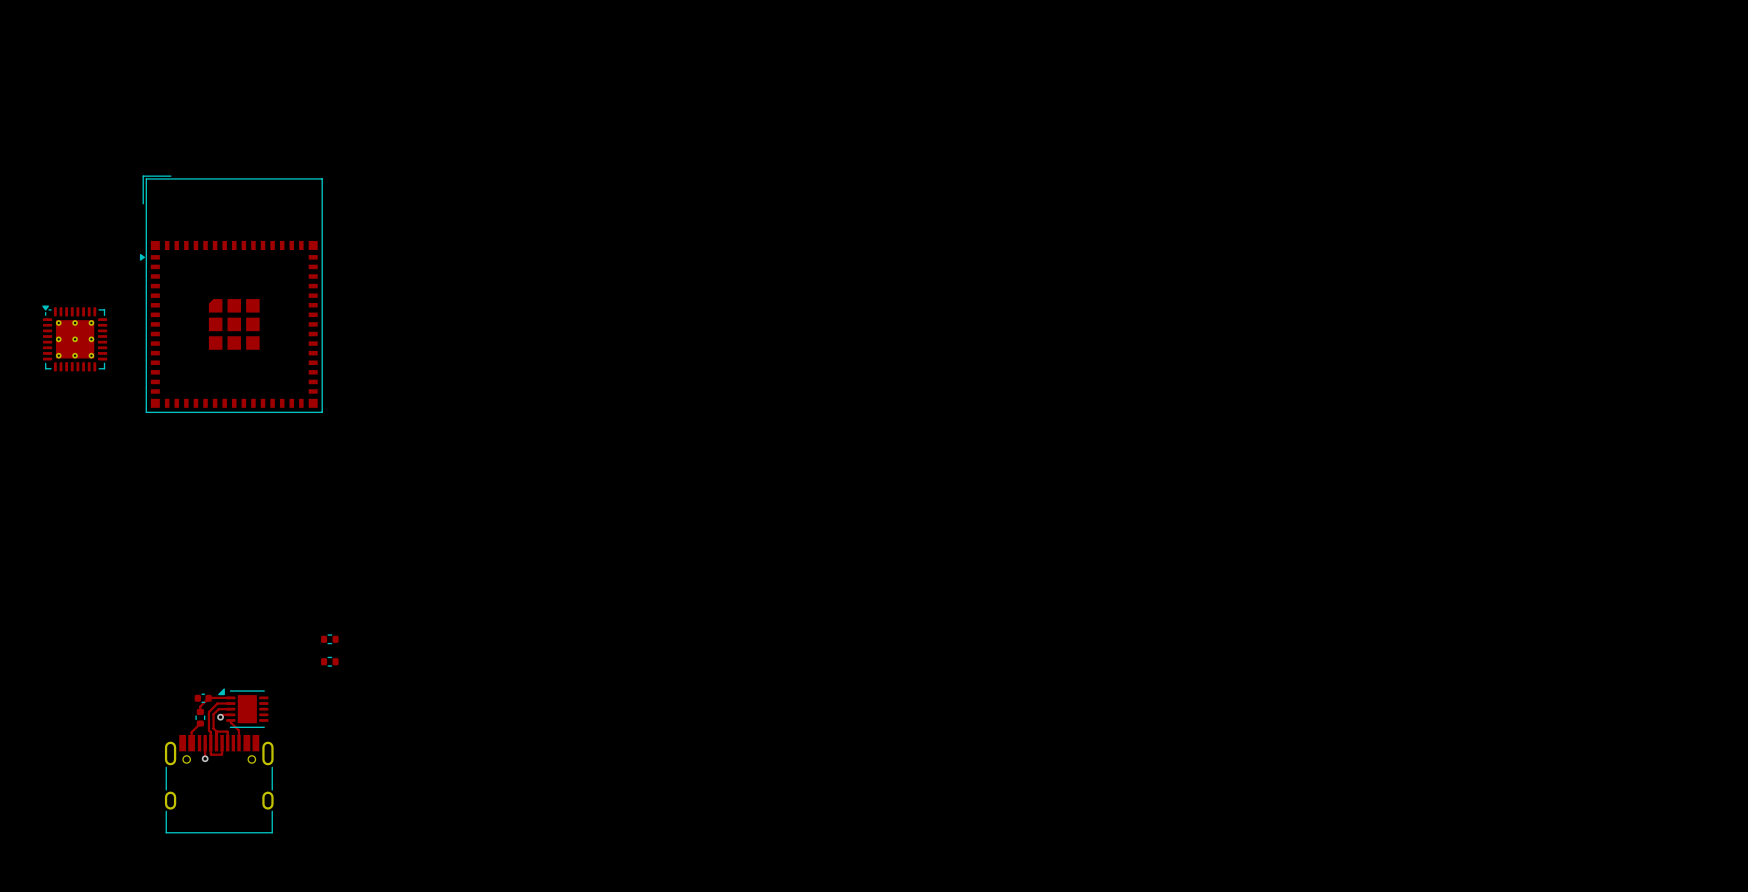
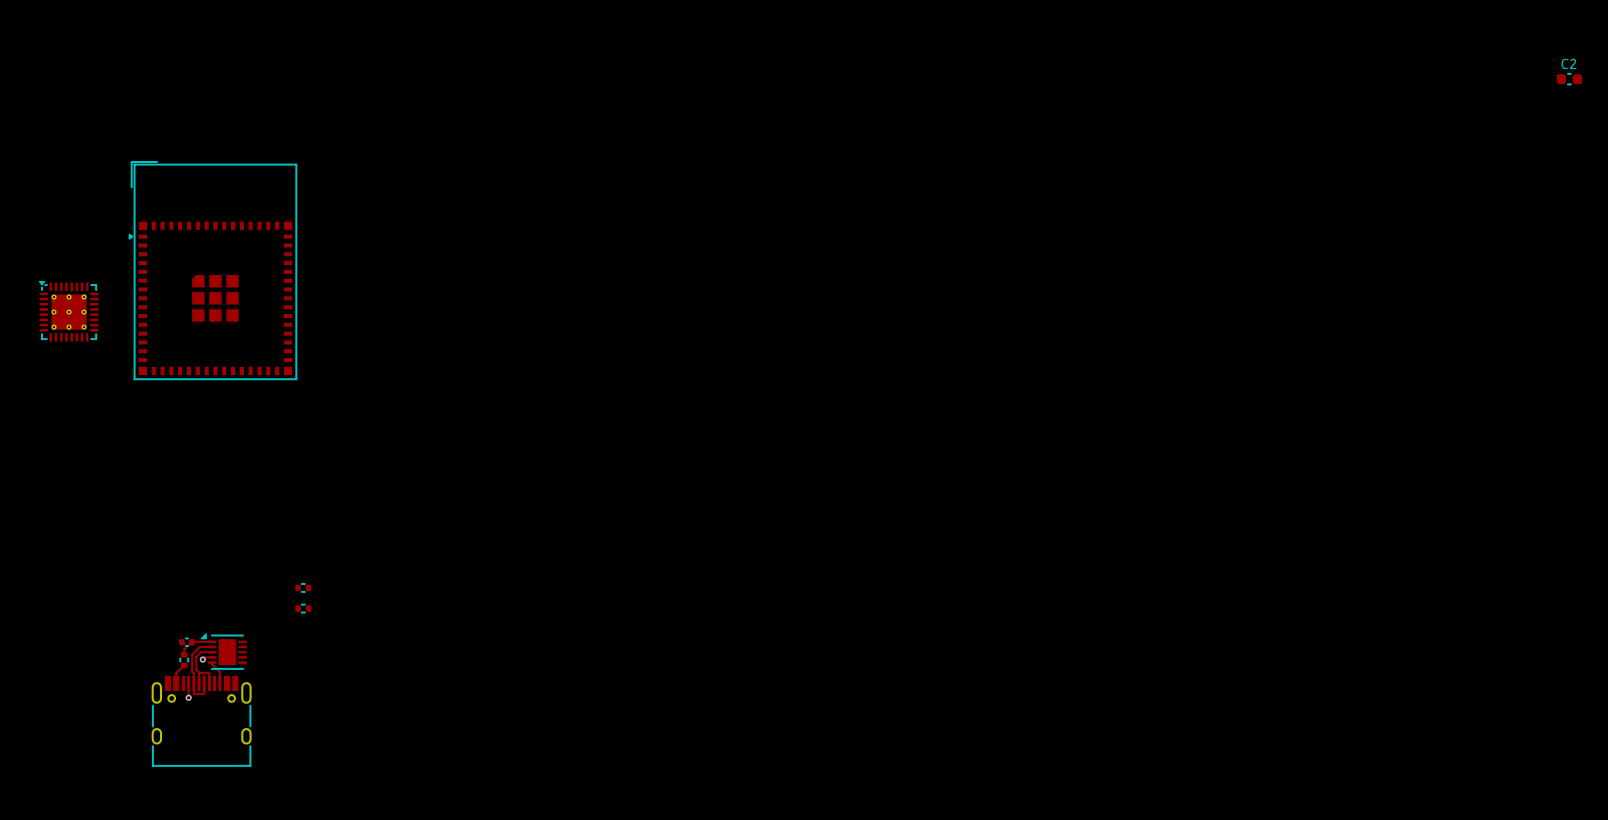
C2: none -> (1569, 79)

